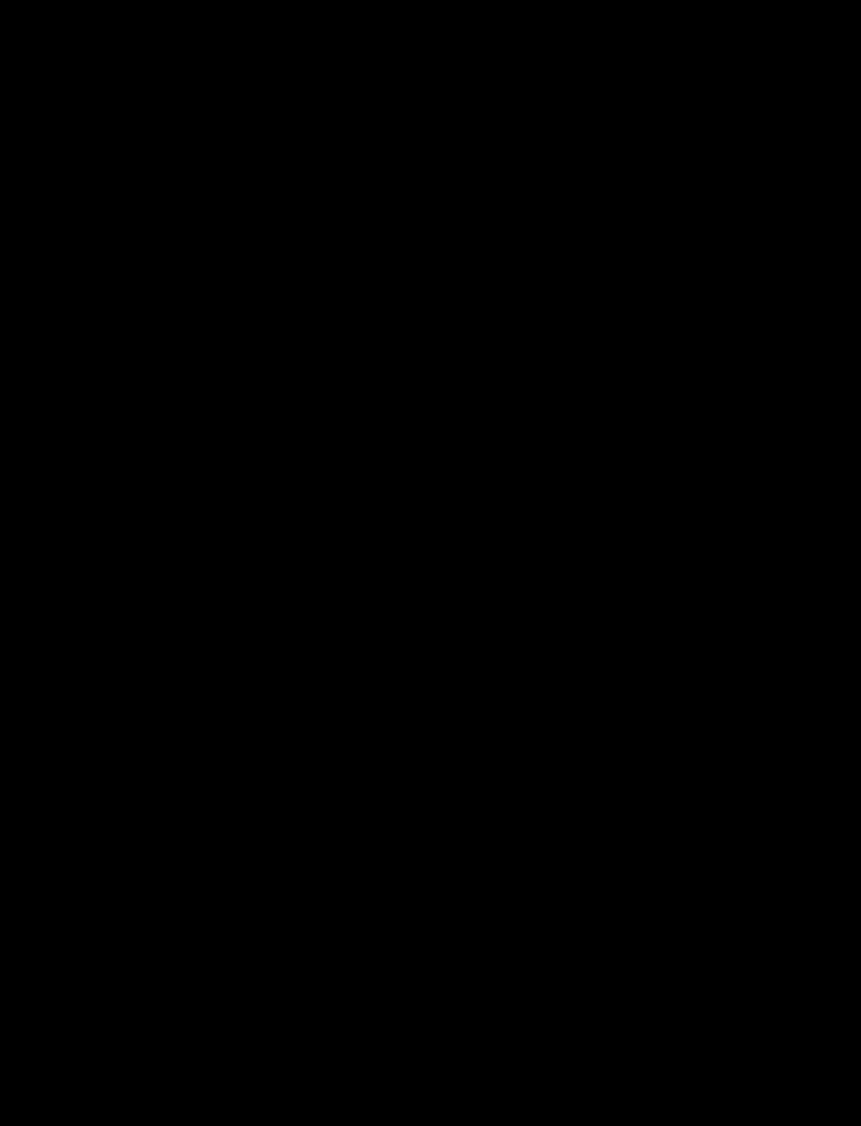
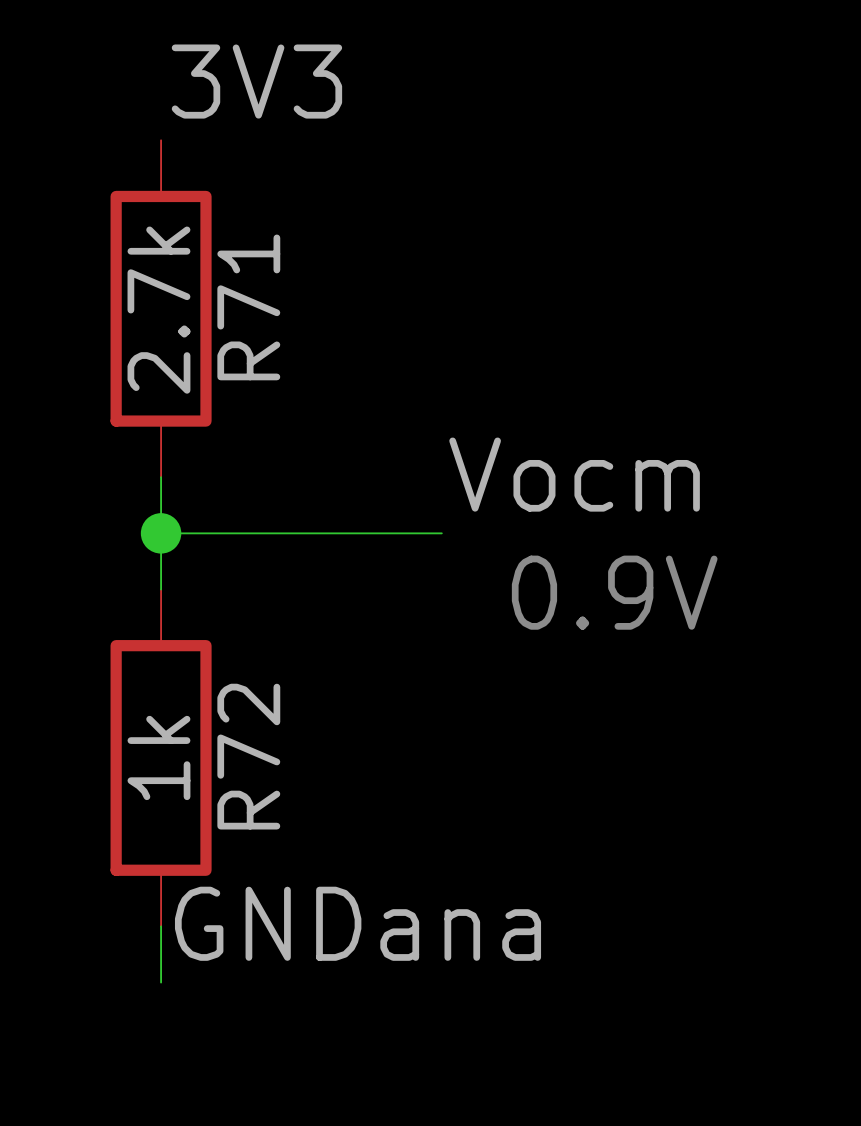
label: none -> 3V3 (256, 81)
R71: none -> 2.7k (161, 308)
label: none -> Vocm (574, 474)
wire: none -> (161, 477) (161, 589)
wire: none -> (161, 533) (441, 533)
junction: none -> (161, 533)
text: none -> 0.9V (614, 592)
R72: none -> 1k (161, 757)
label: none -> GNDana (358, 923)
wire: none -> (161, 926) (161, 982)

